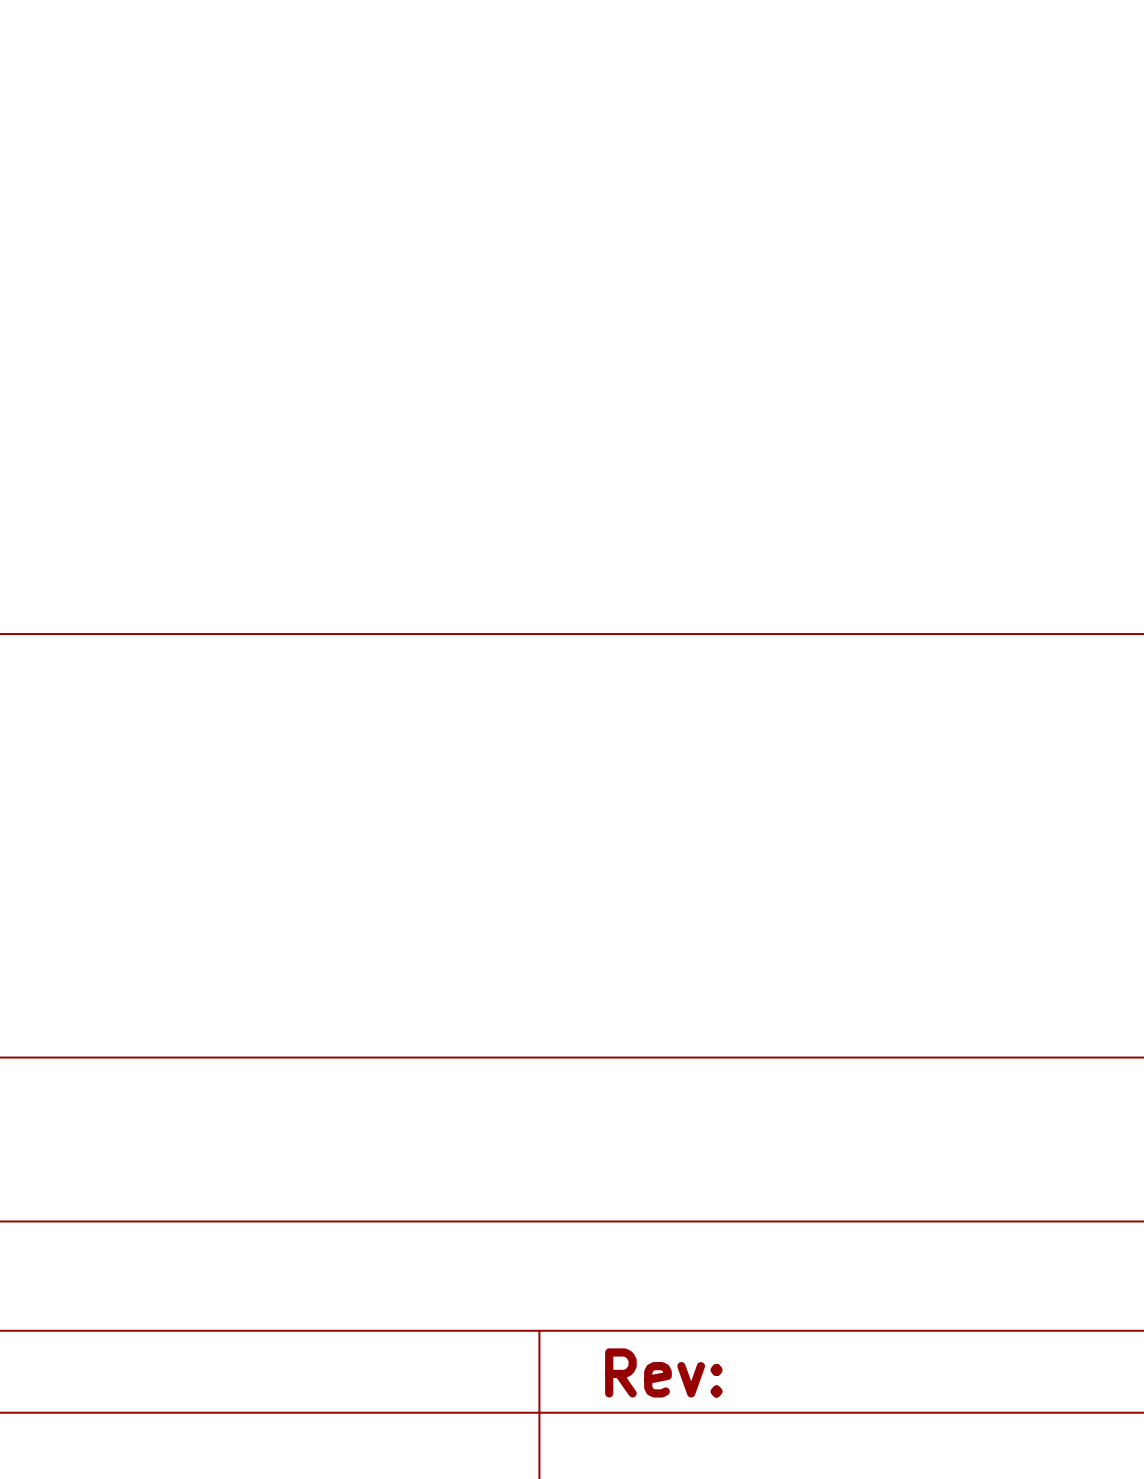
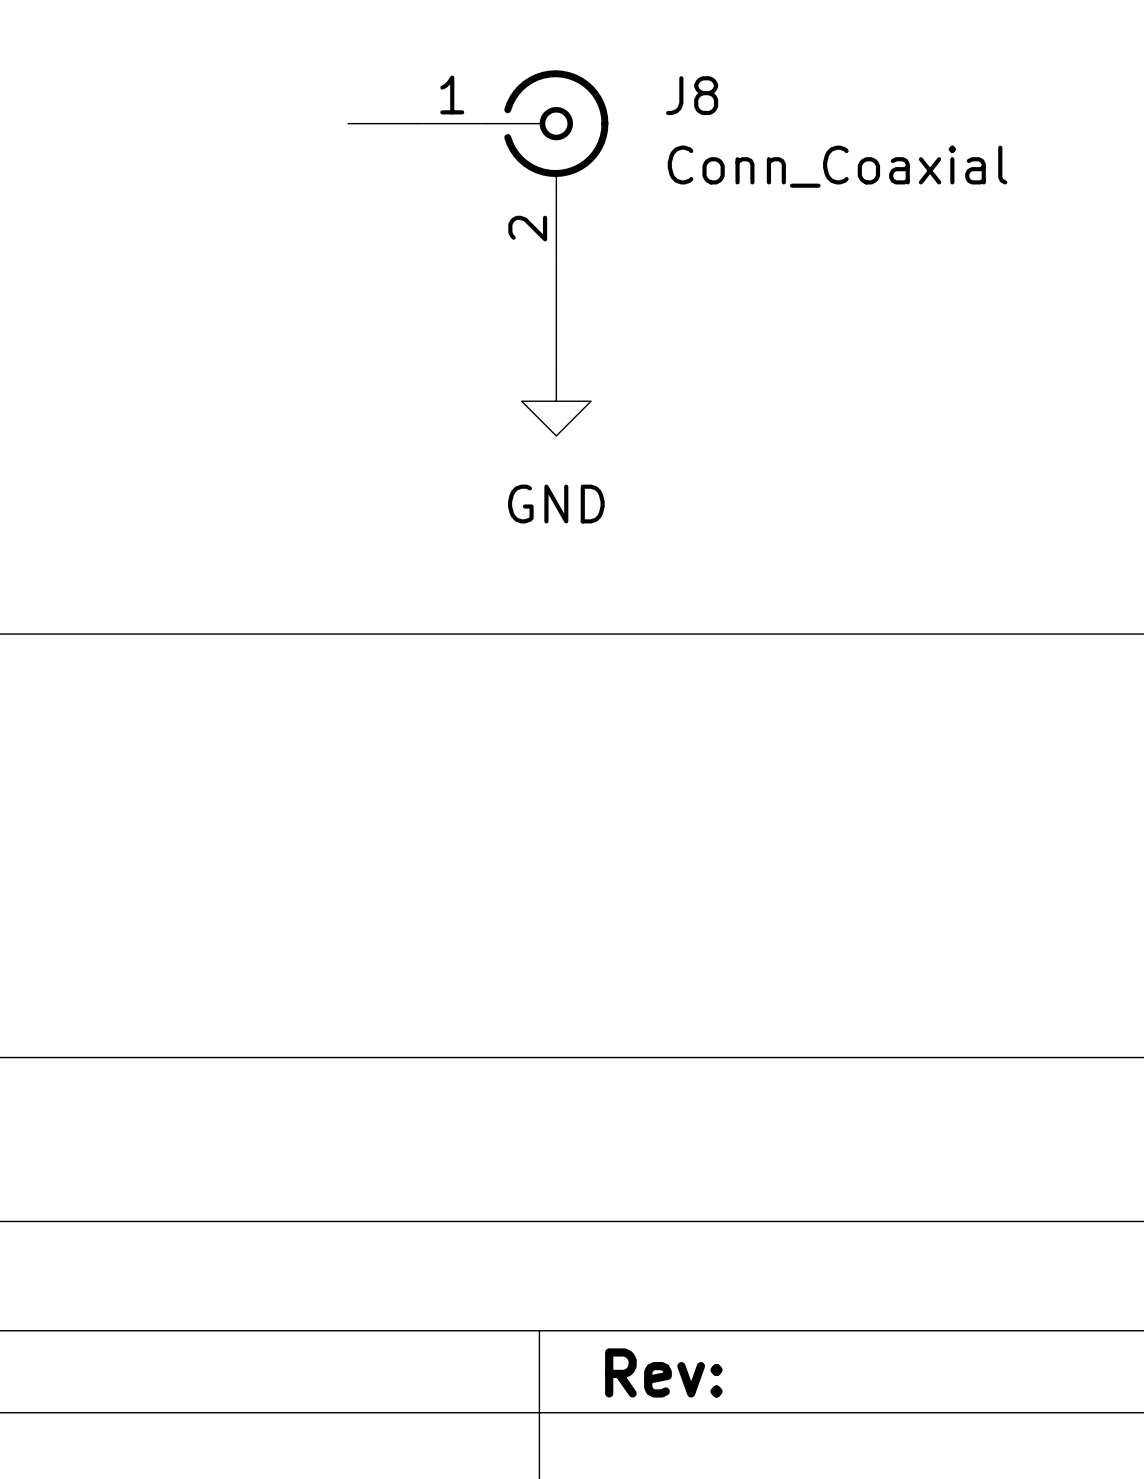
wire: none -> (348, 123) (417, 123)
J8: none -> Conn_Coaxial (512, 166)
wire: none -> (556, 262) (556, 366)
power symbol: none -> GND (556, 401)

